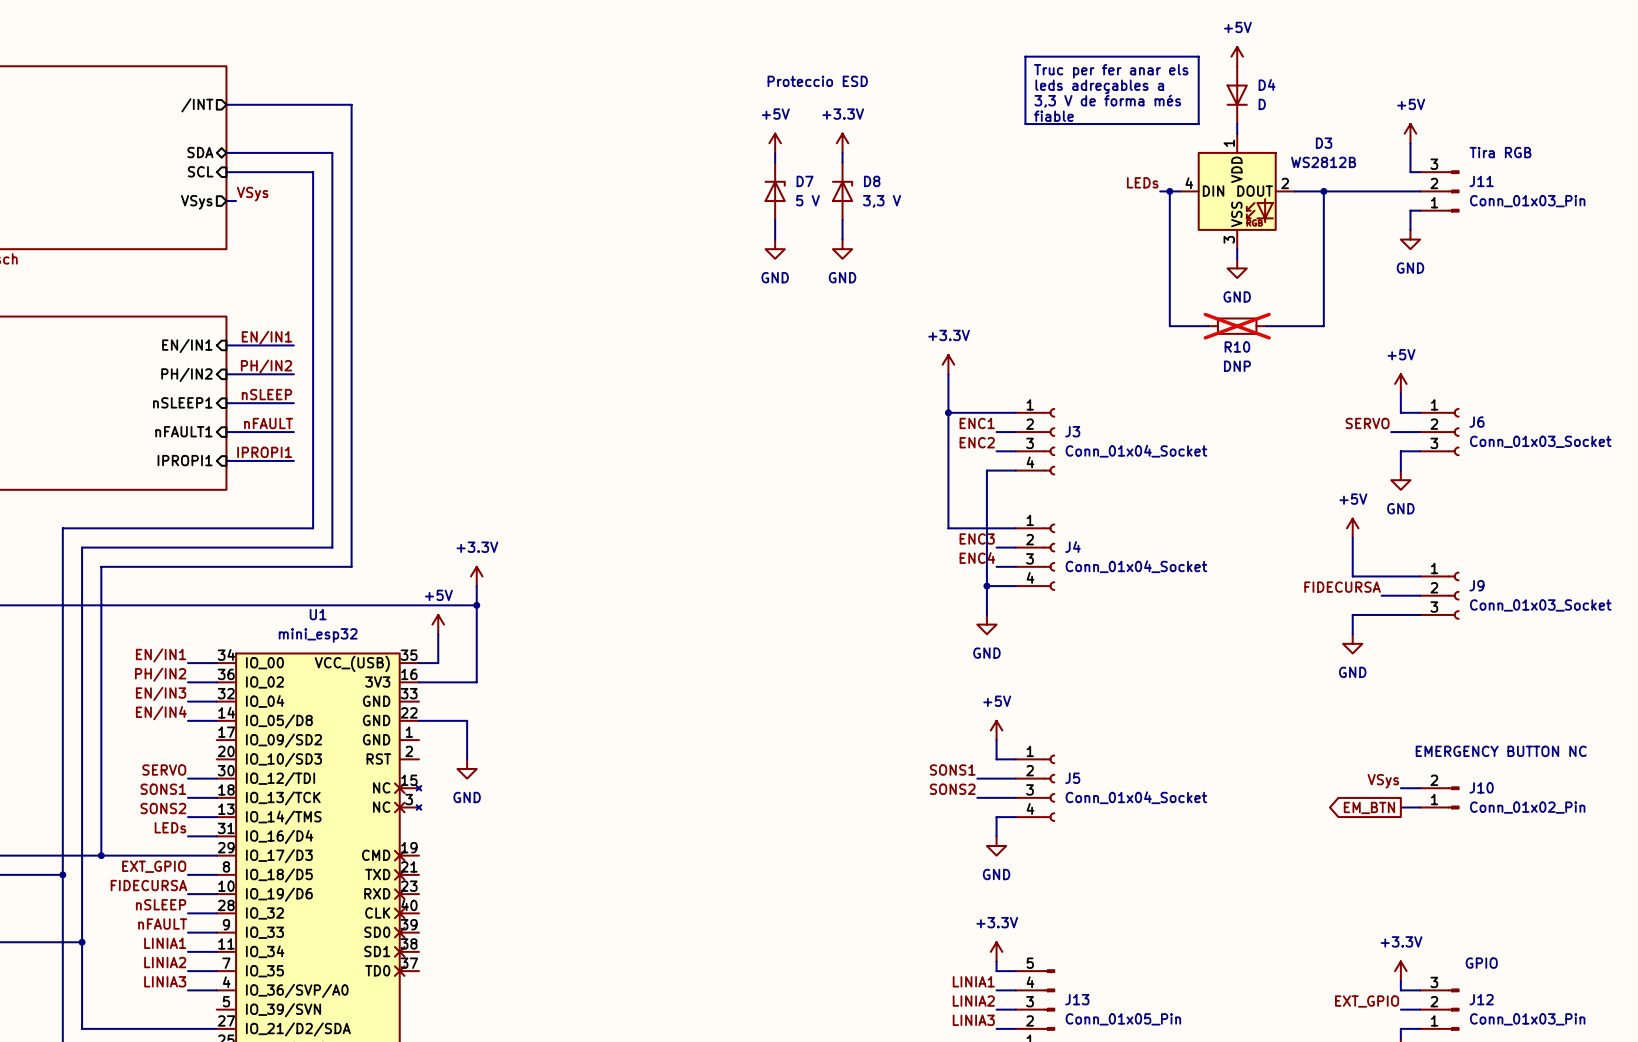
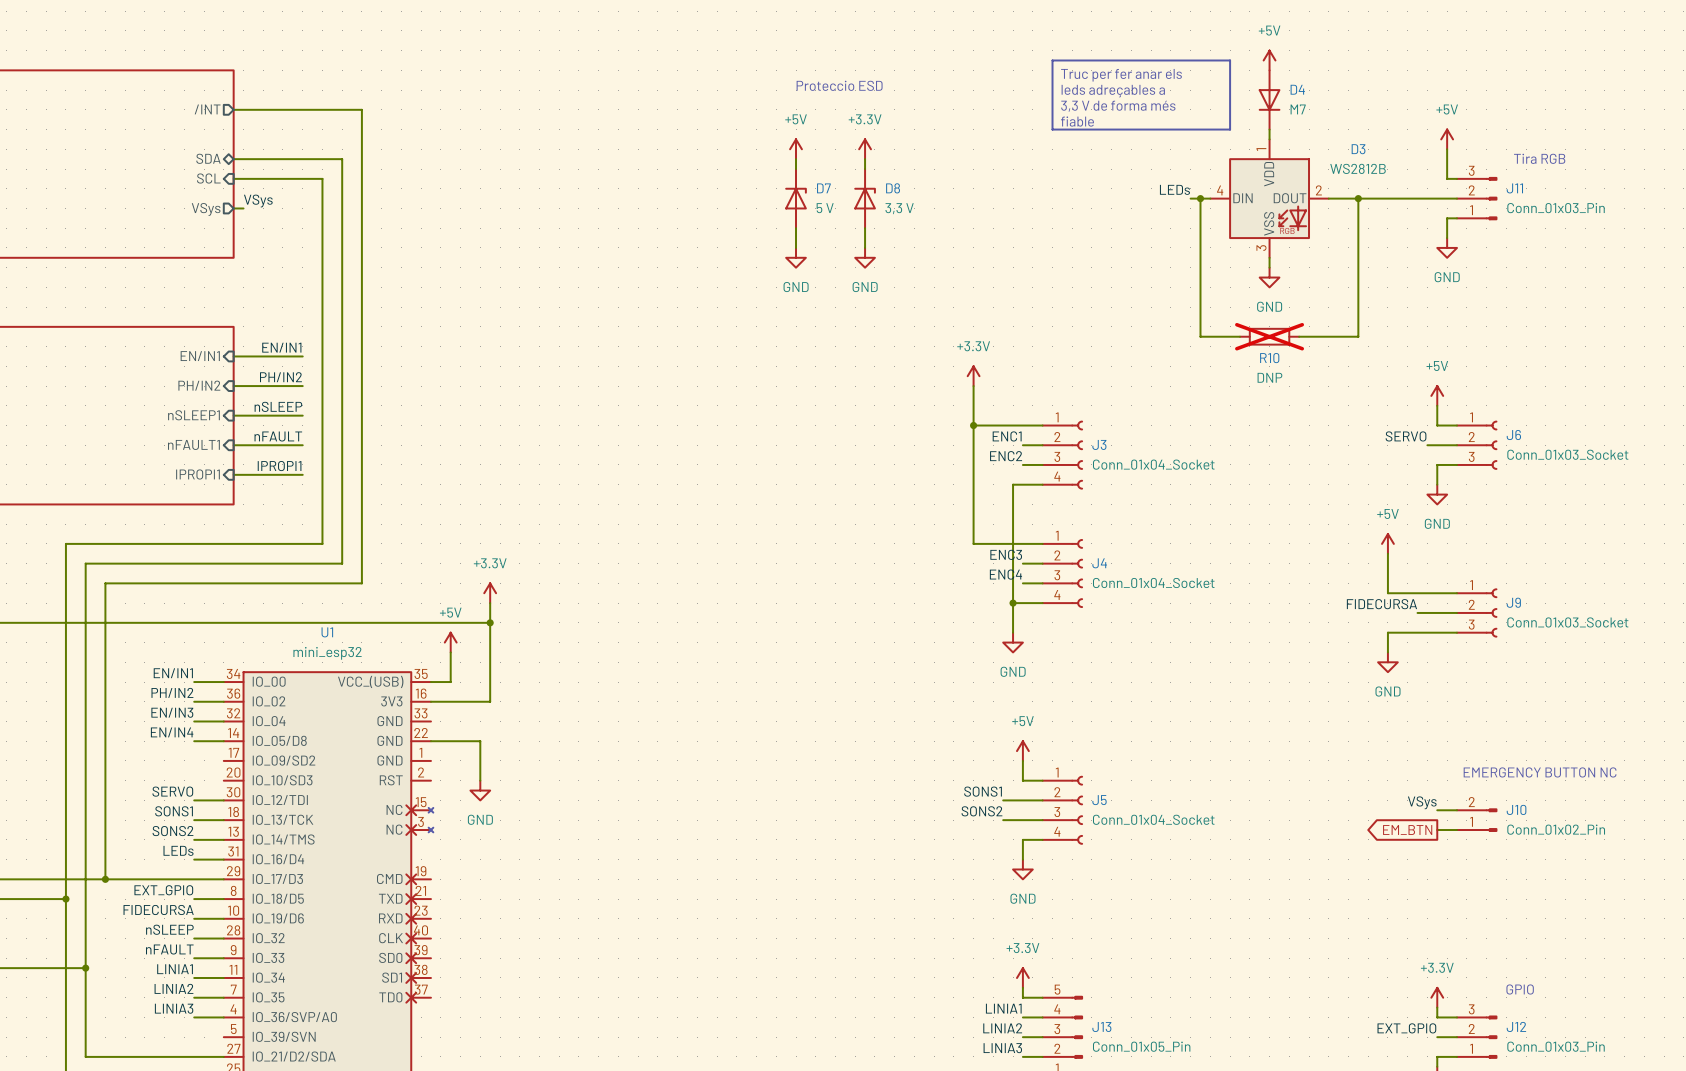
D4 value: D (1262, 104) -> M7 (1298, 109)

